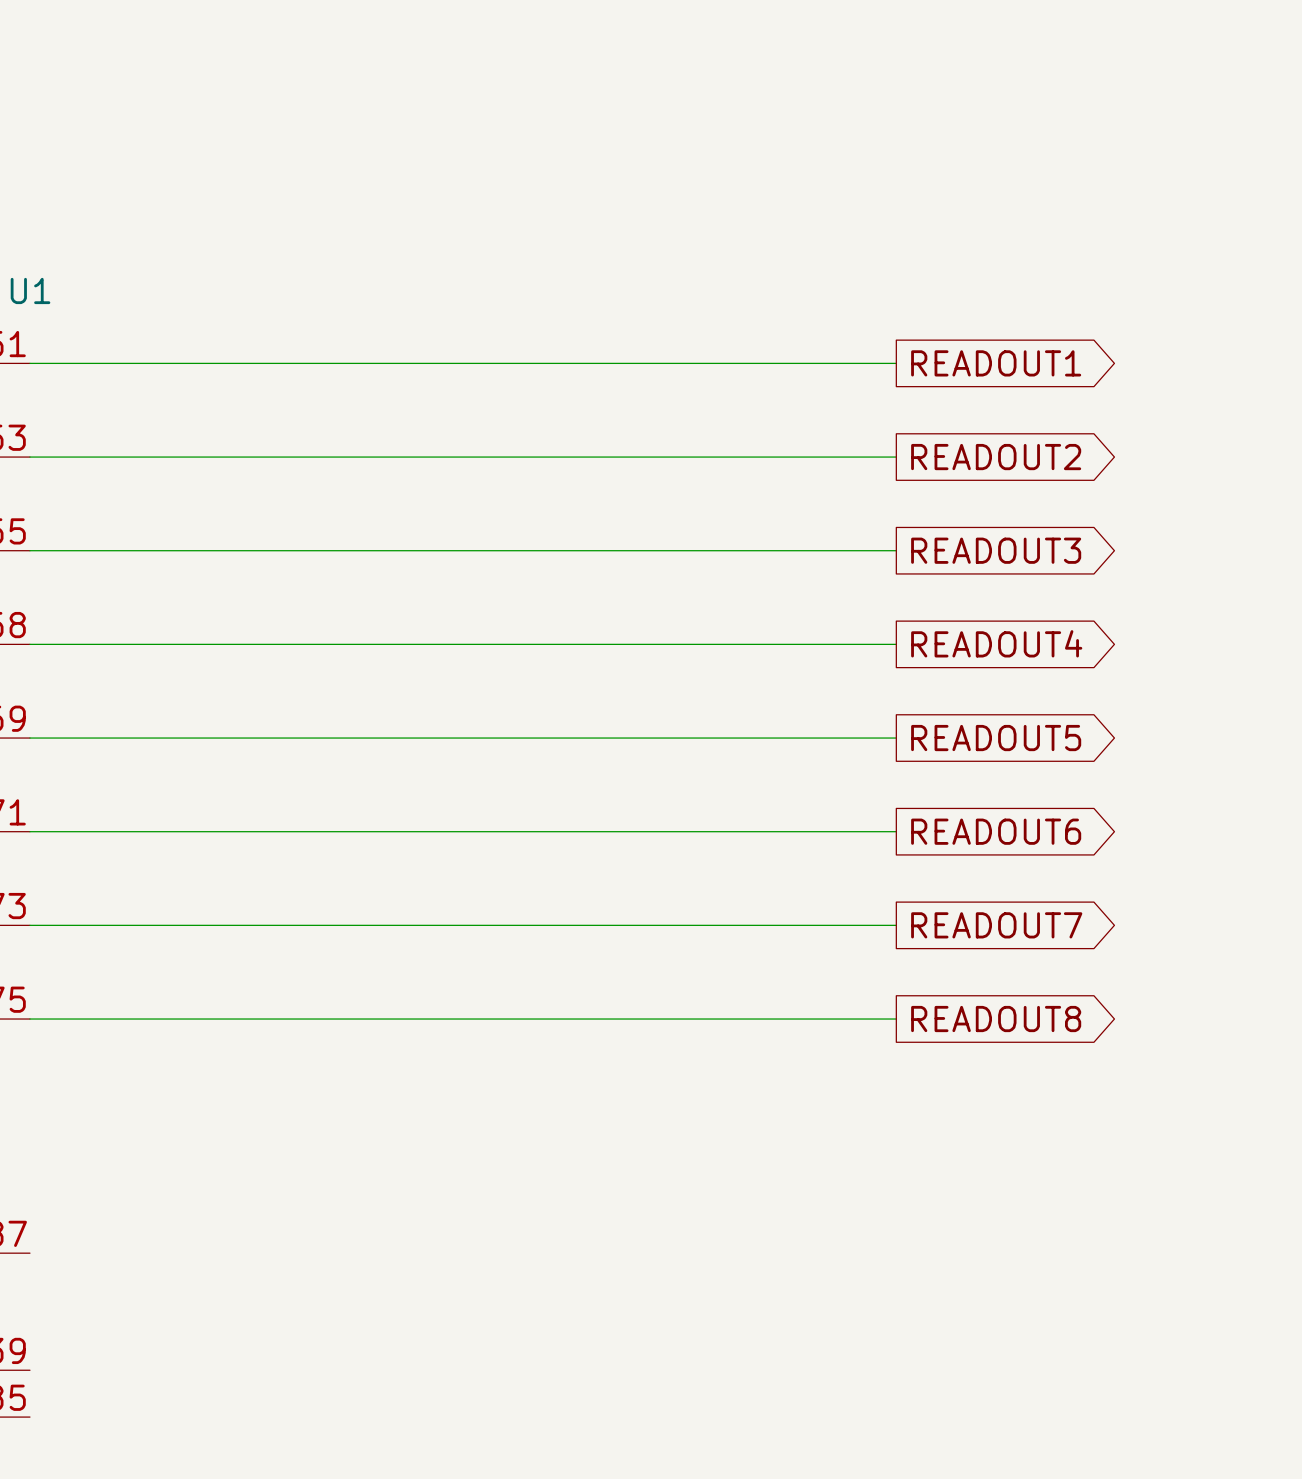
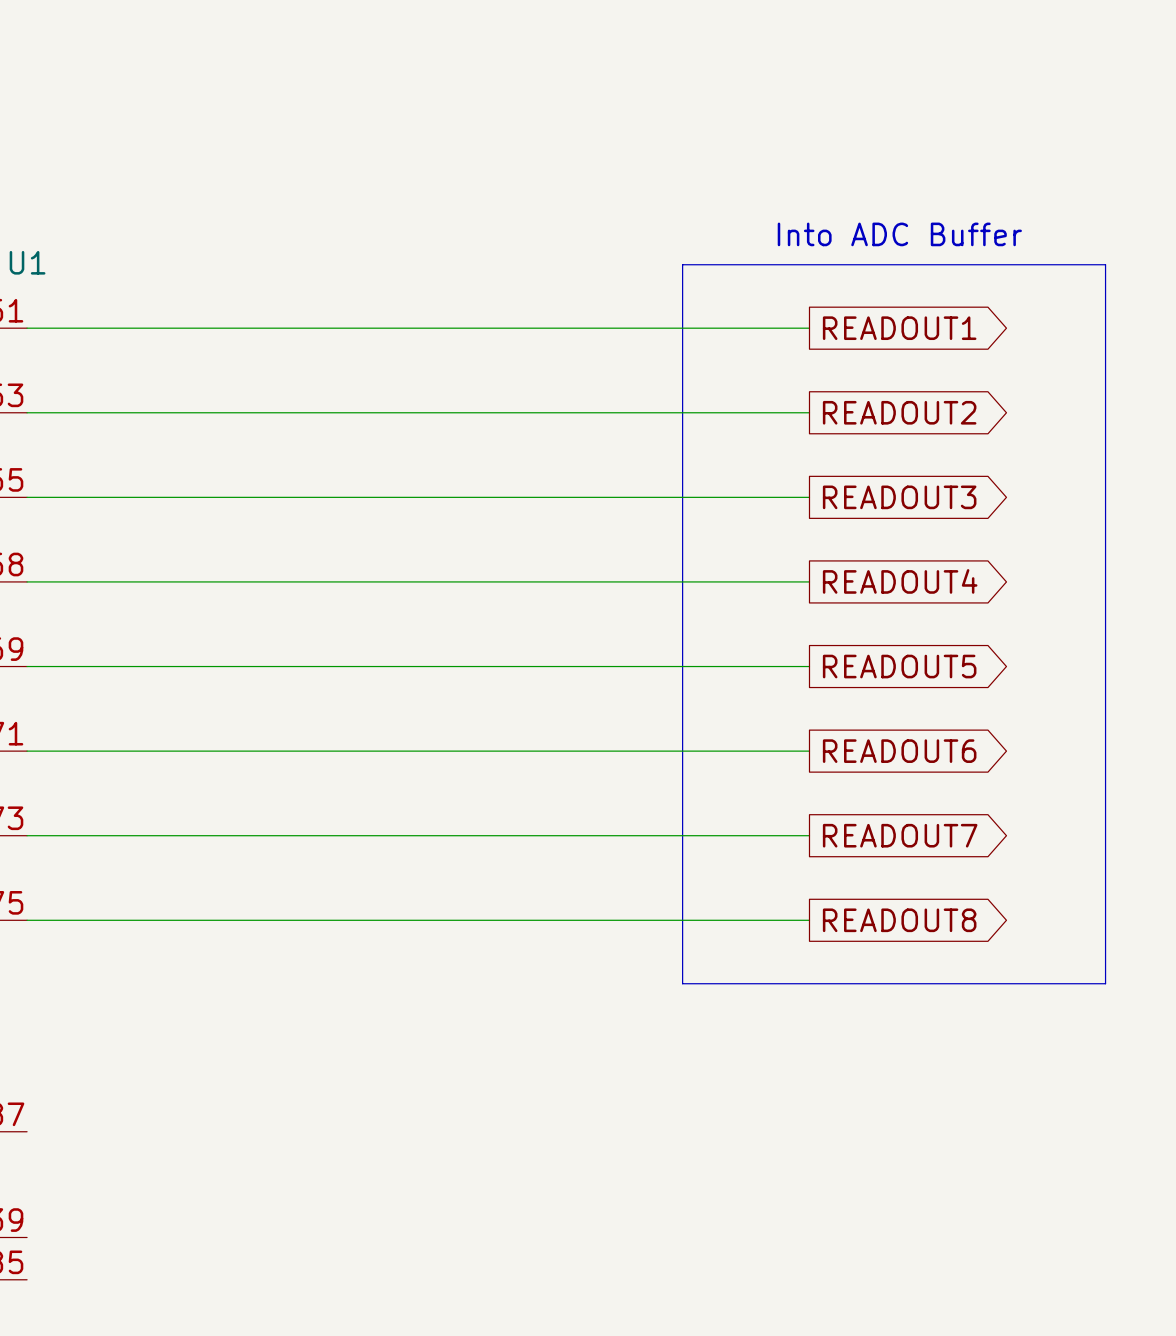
text: none -> Into ADC Buffer (899, 234)
line: none -> (682, 264) (1105, 264) (1105, 983) (682, 983) (682, 264)

